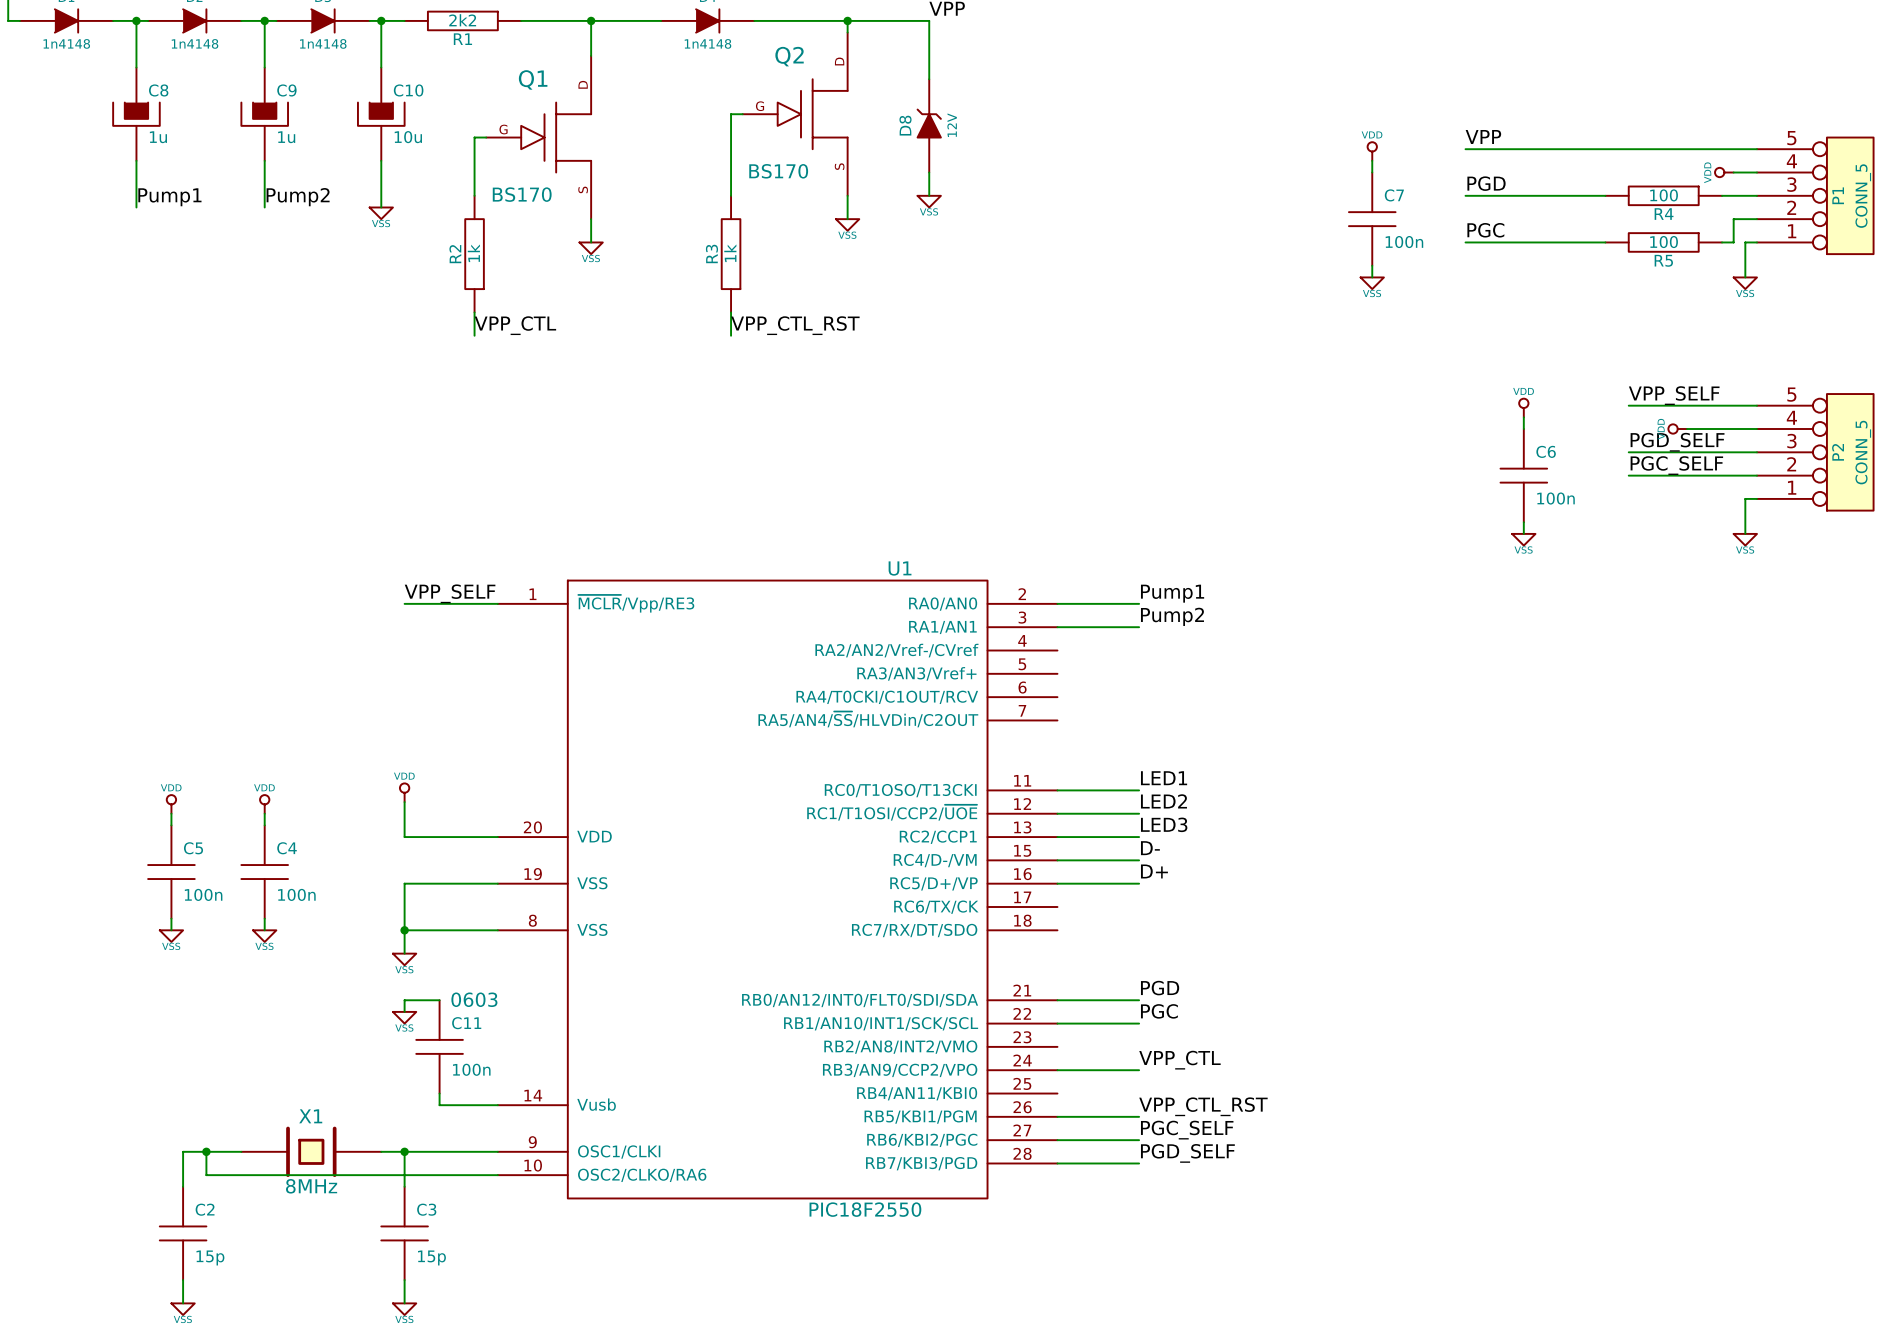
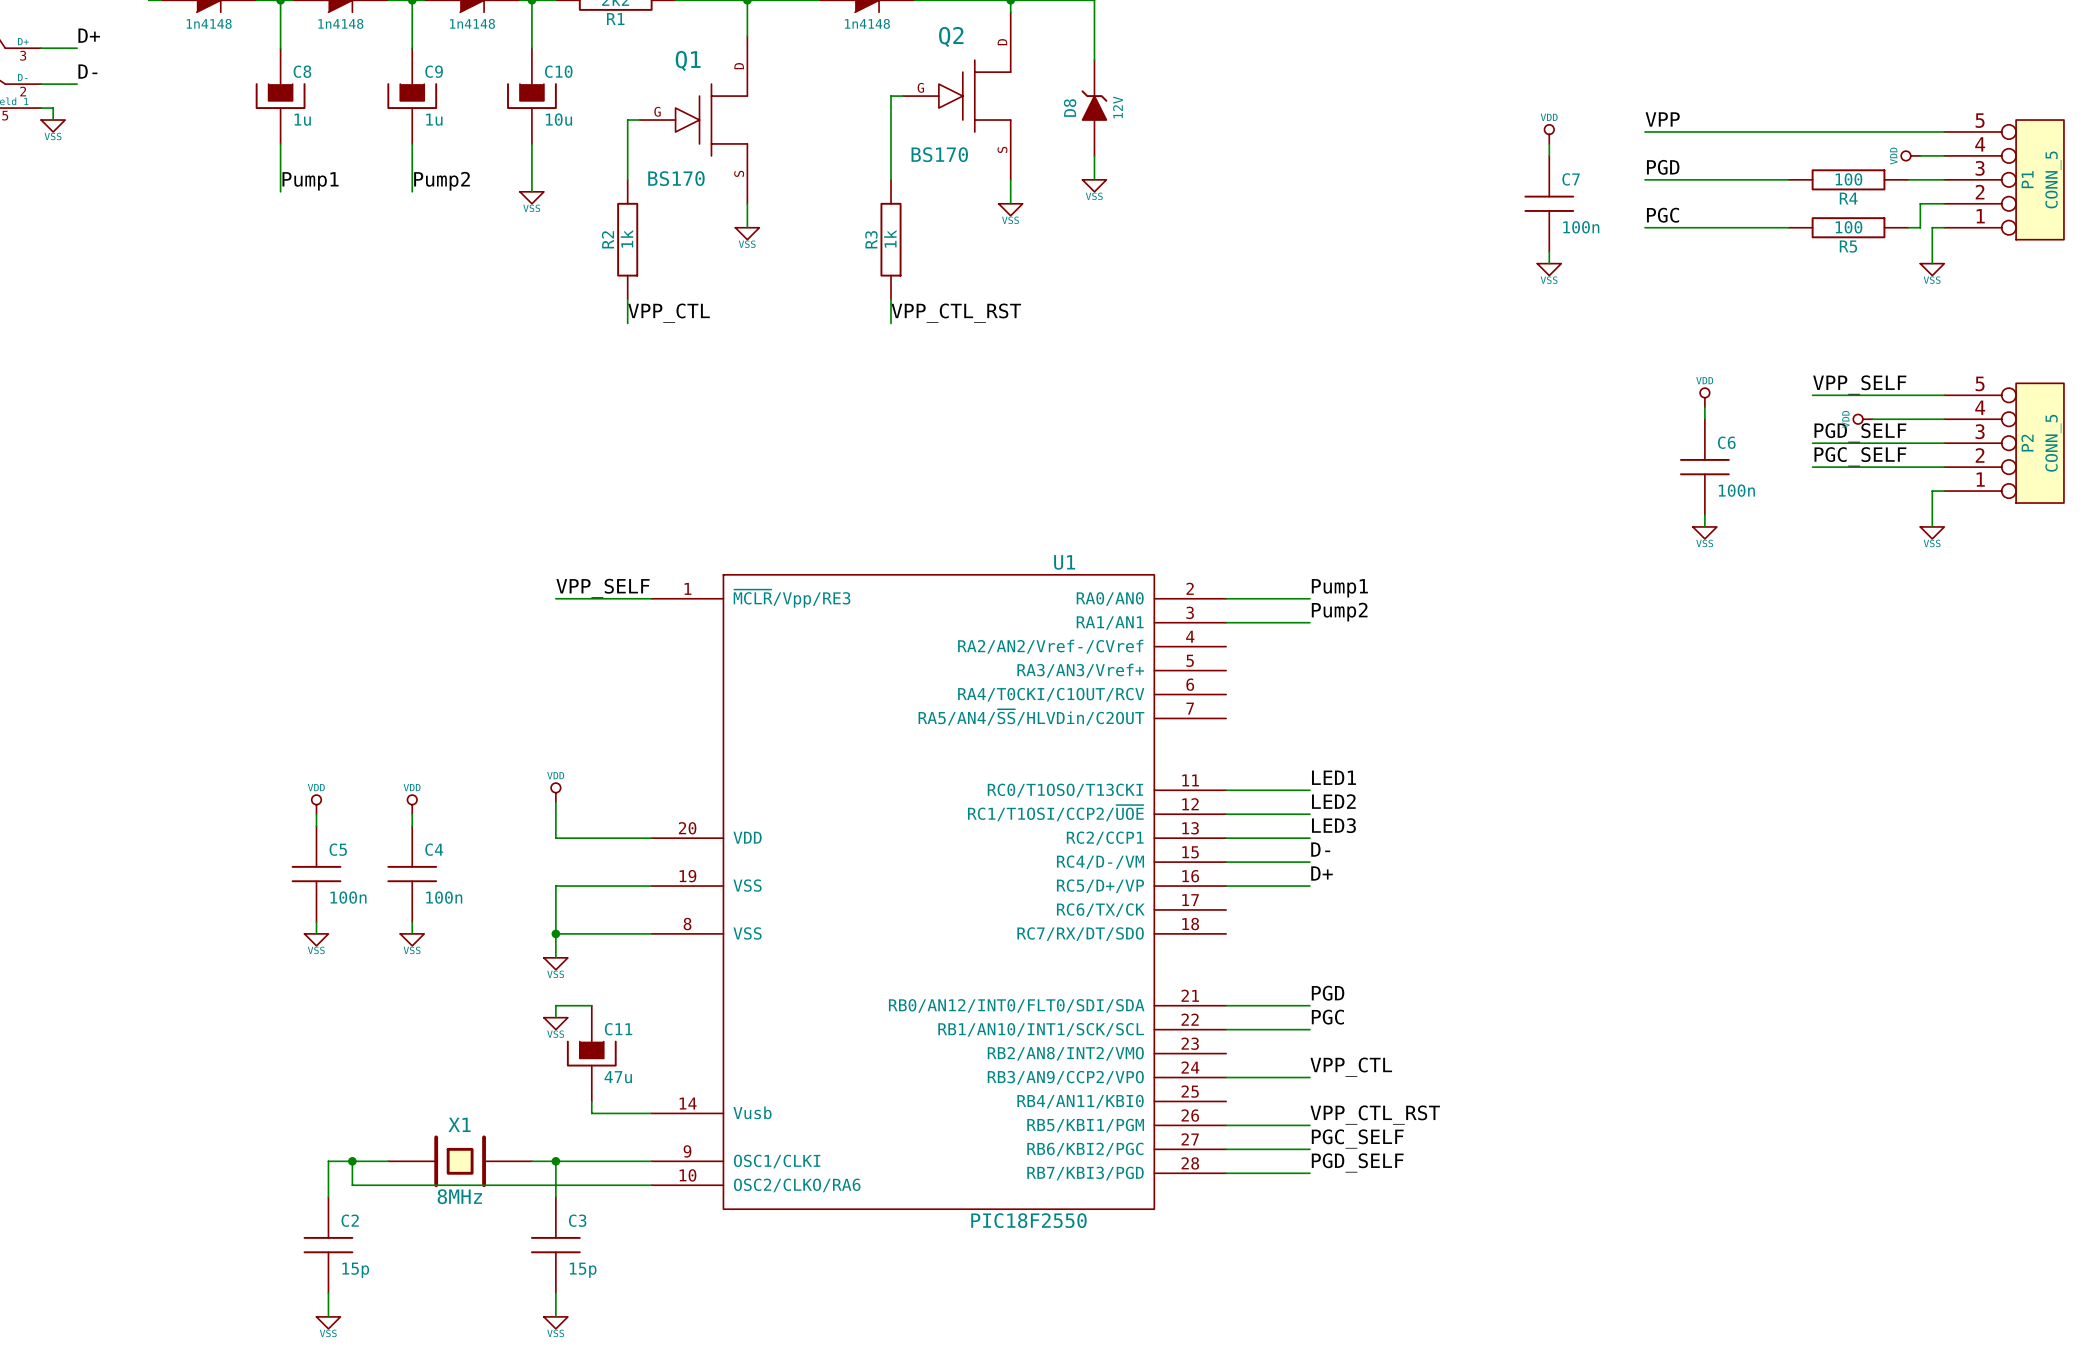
C11 text: 0603 (474, 999) -> none
C11 symbol: [415, 1000, 464, 1094] -> [566, 1005, 617, 1102]
C11 value: 100n (471, 1069) -> 47u (618, 1077)

